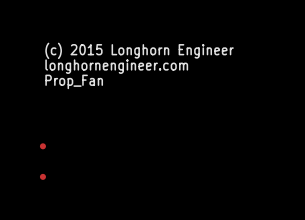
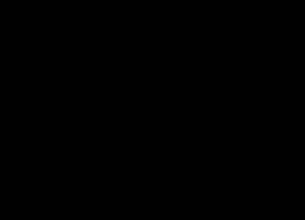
drawing: [45, 42, 234, 90] -> none
part: (42, 146) -> none
part: (42, 176) -> none

